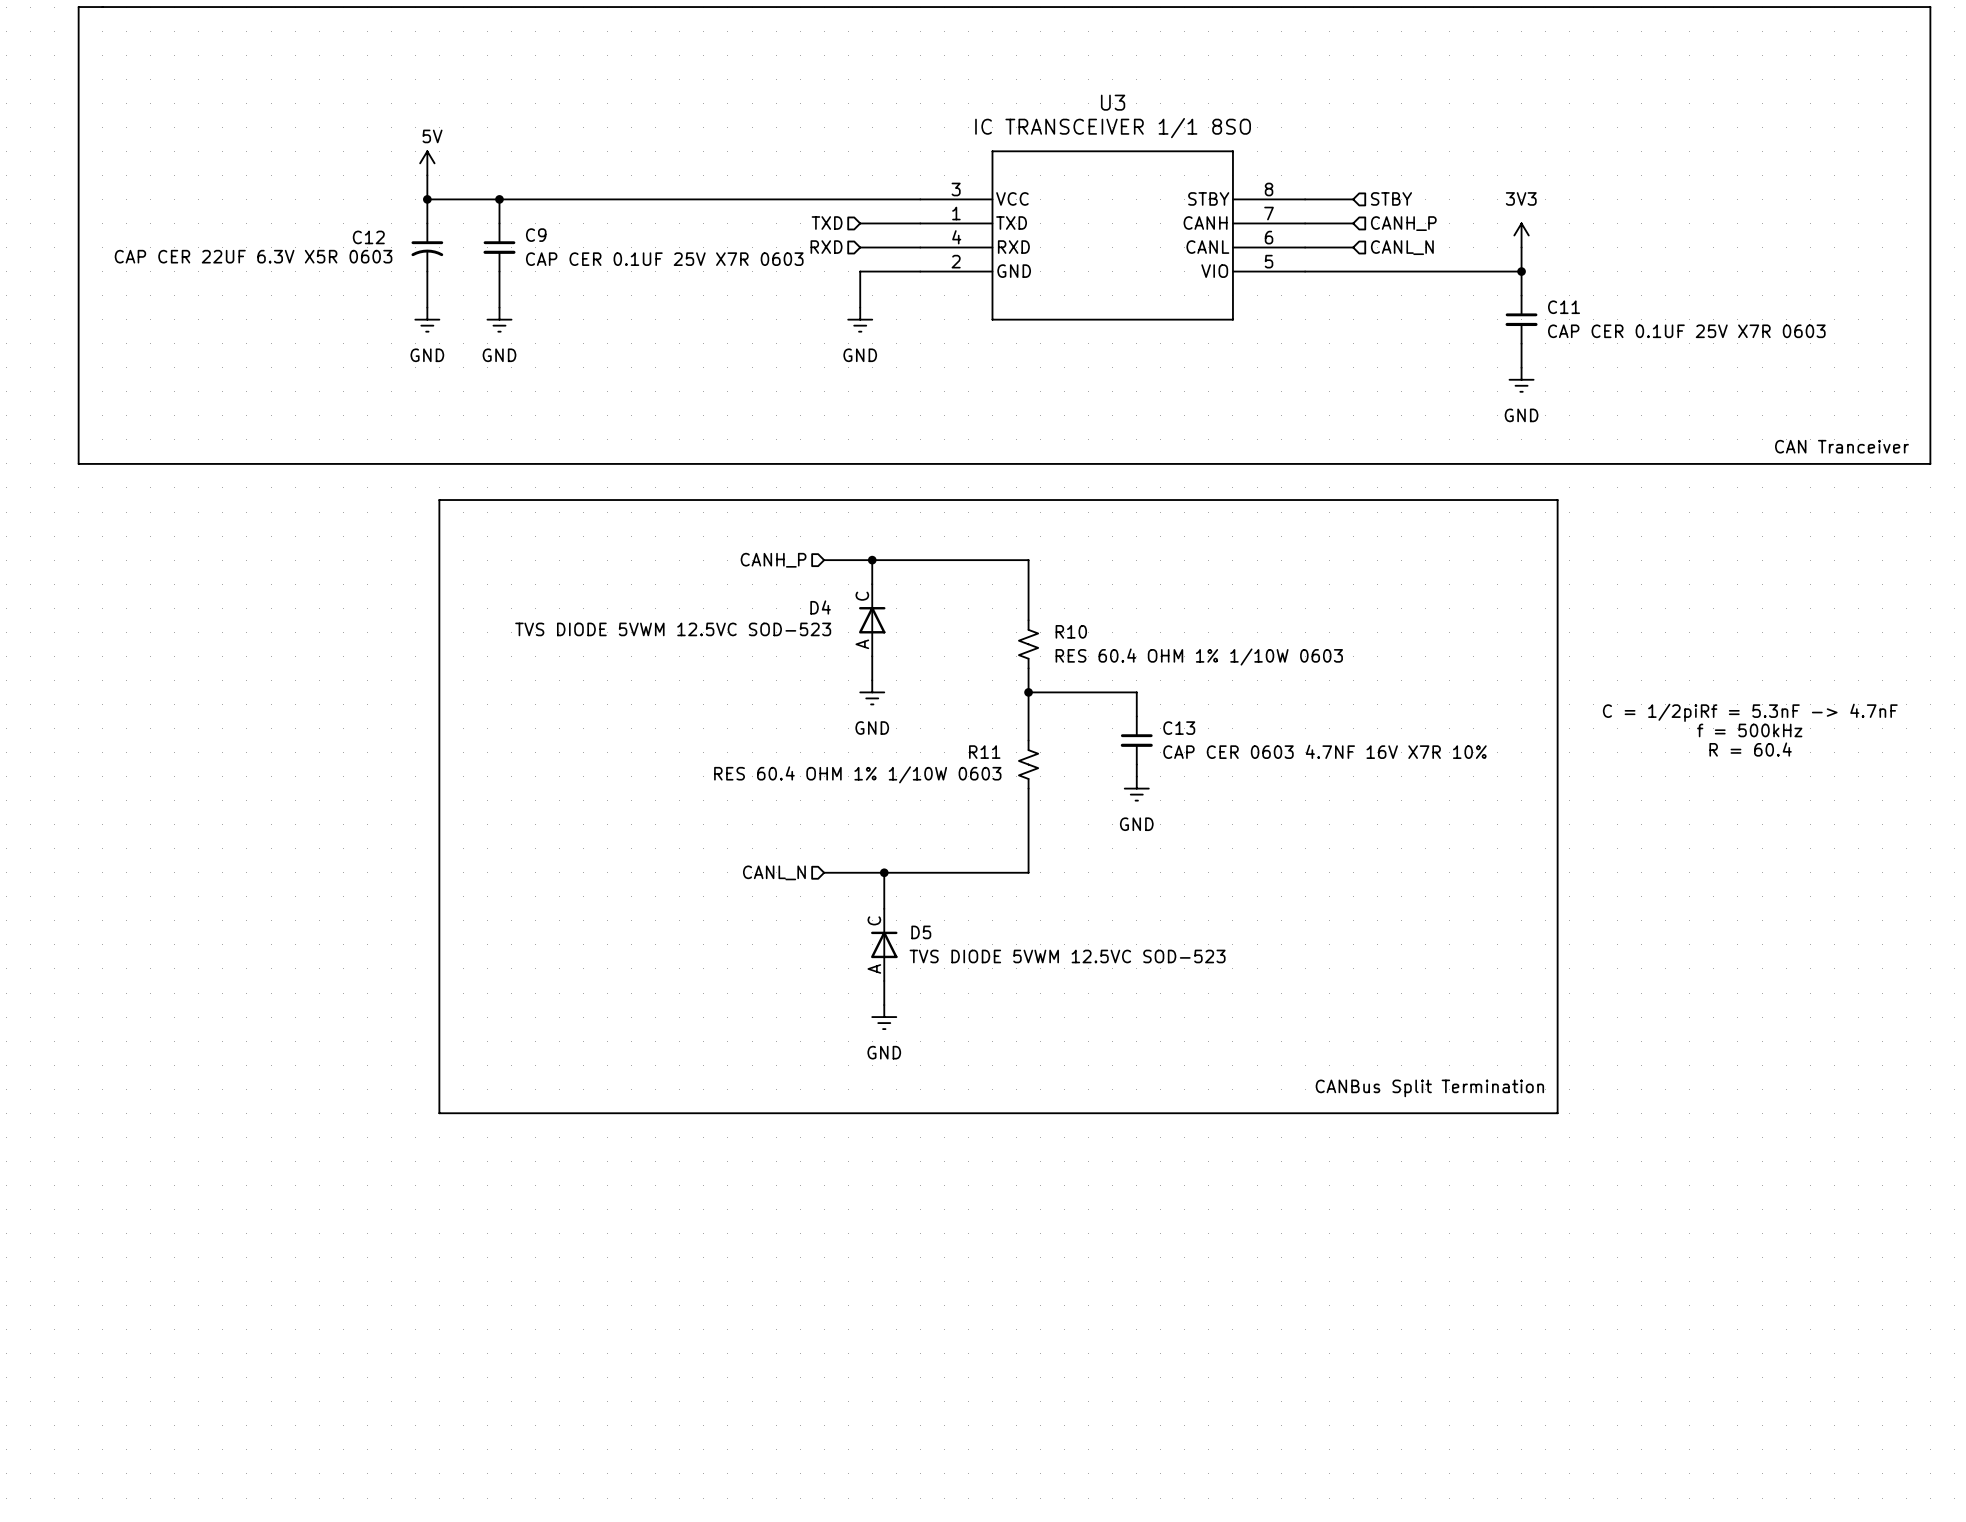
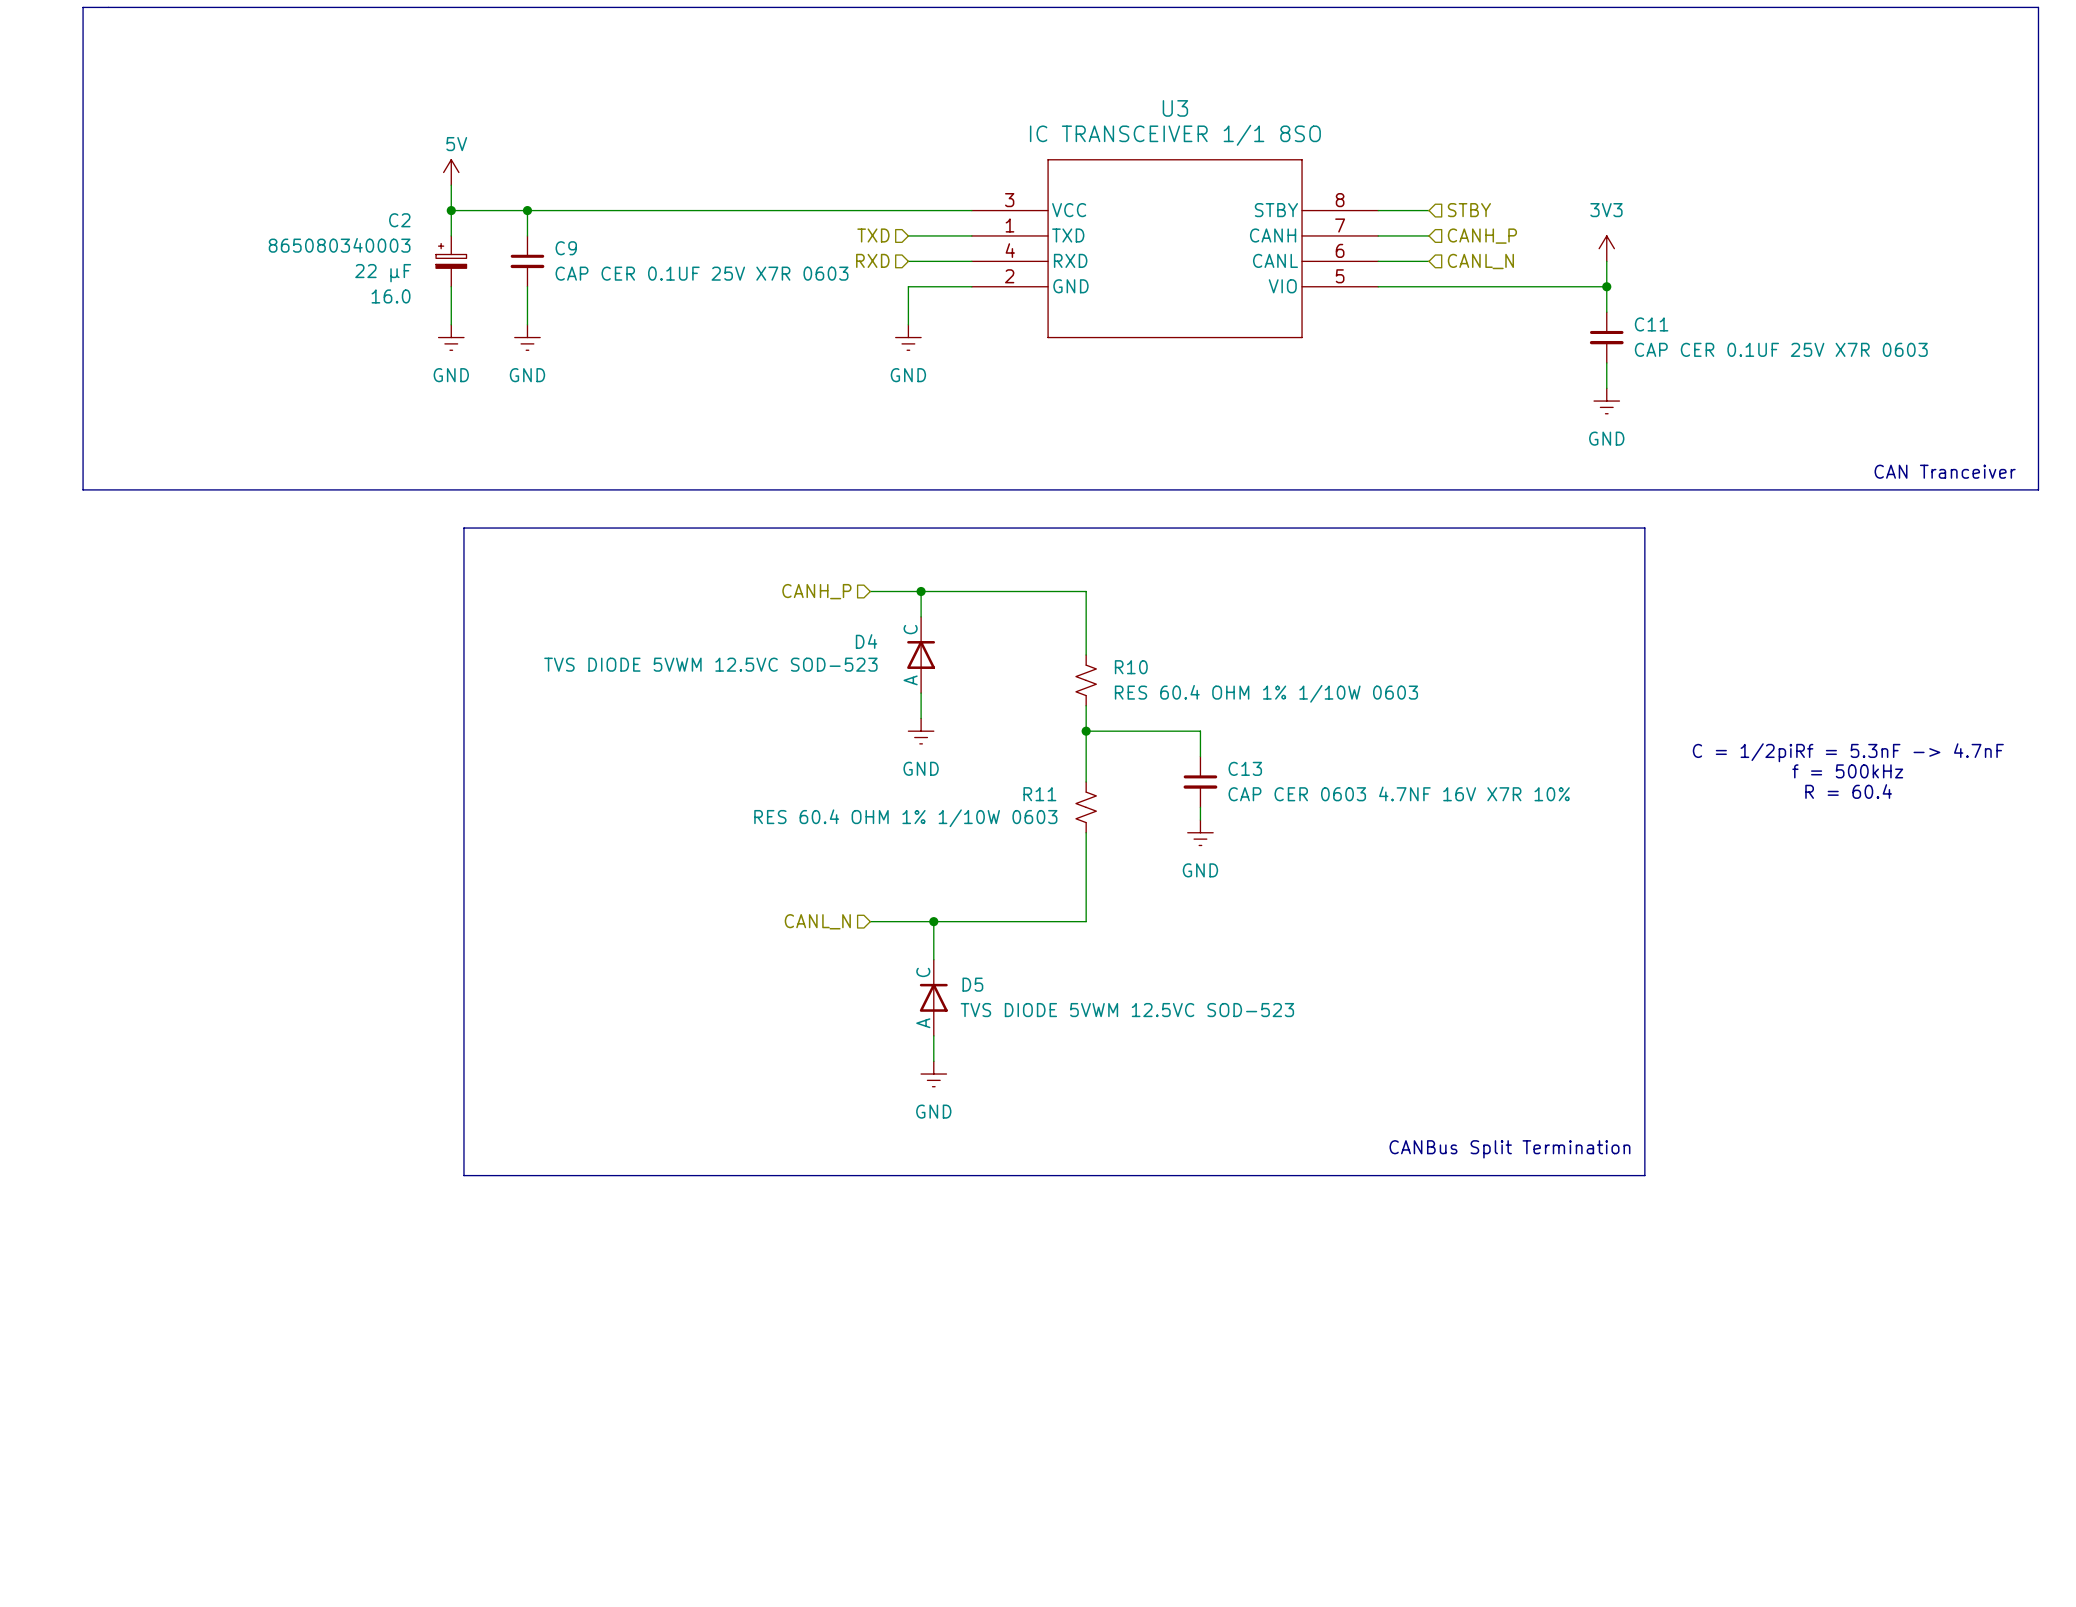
C12: CAP CER 22UF 6.3V X5R 0603 (427, 247) -> none
C2: none -> (451, 261)

